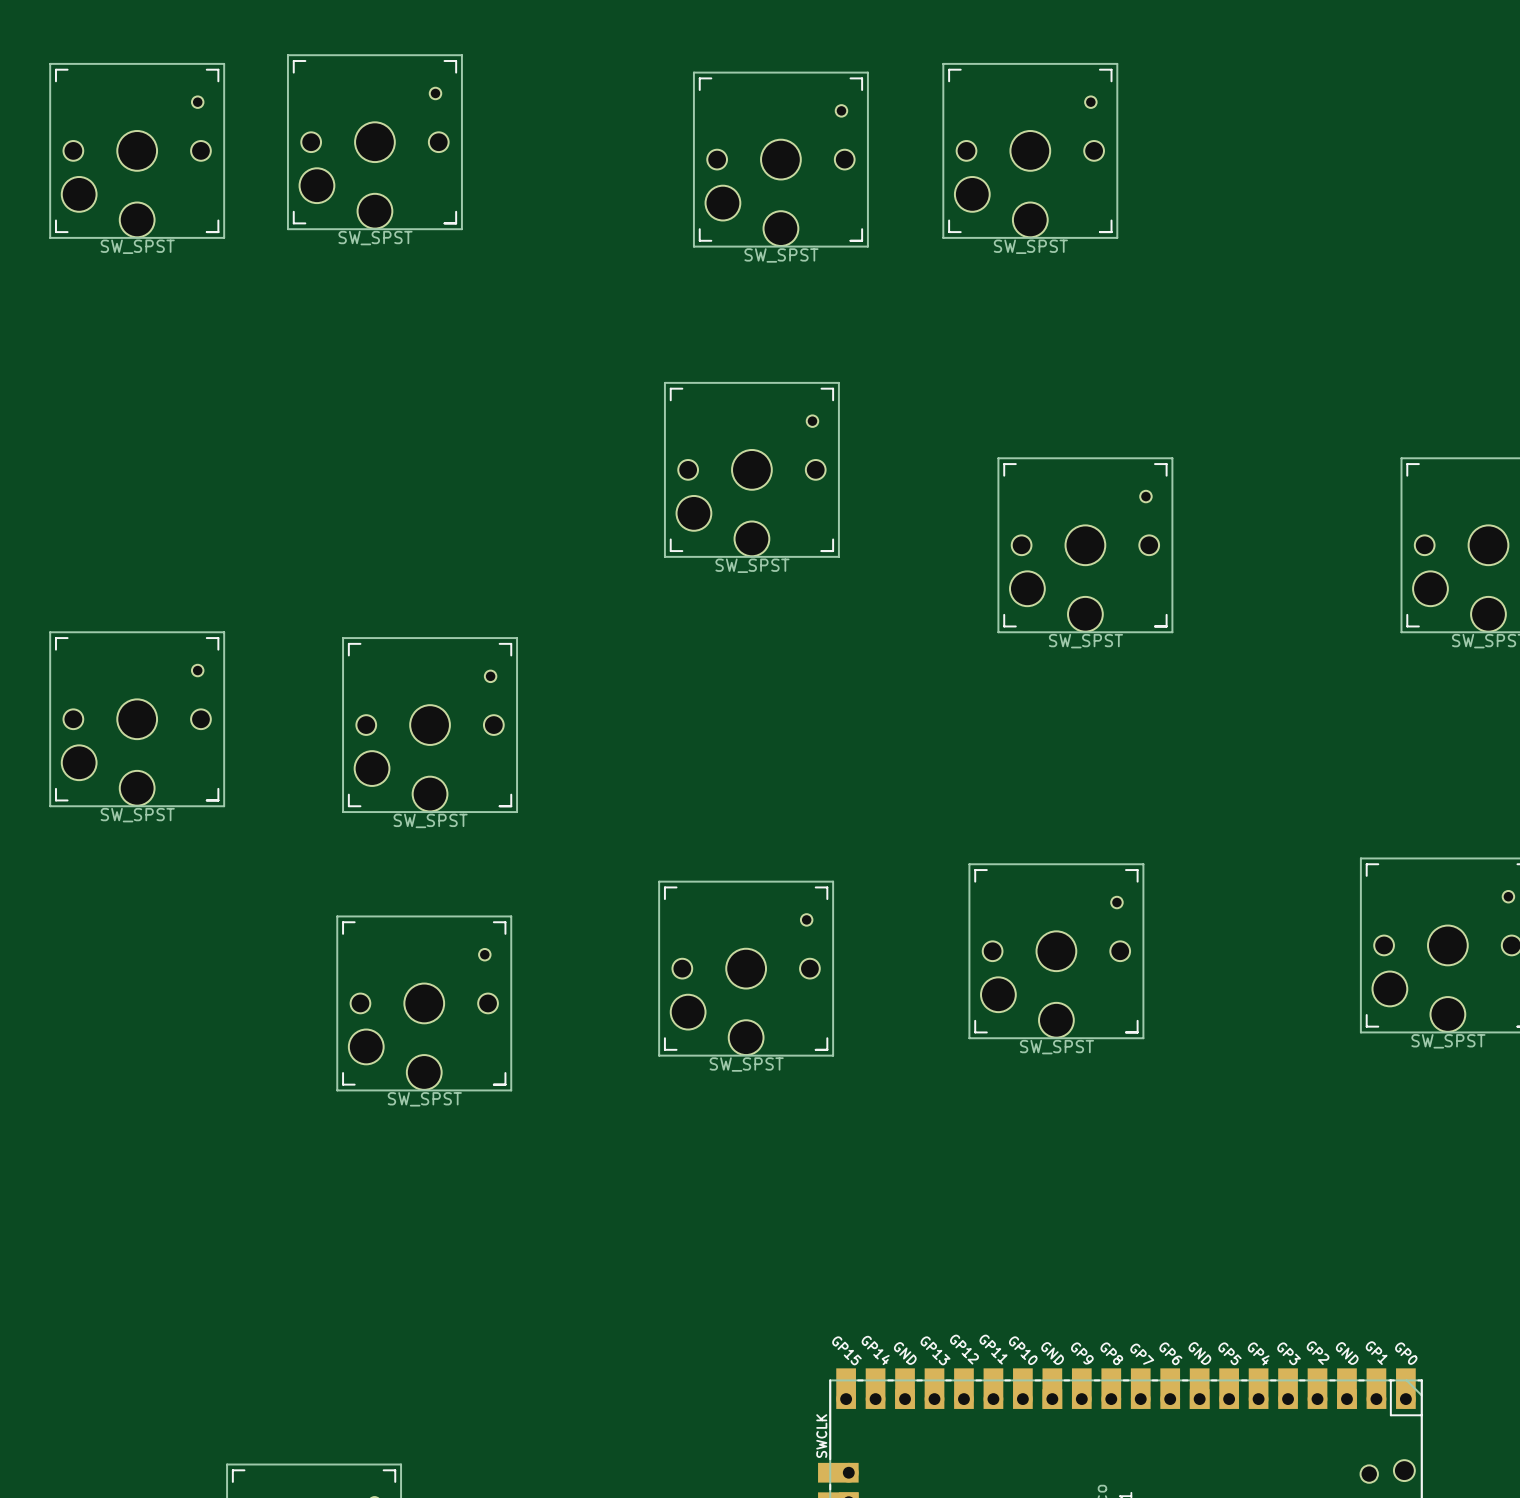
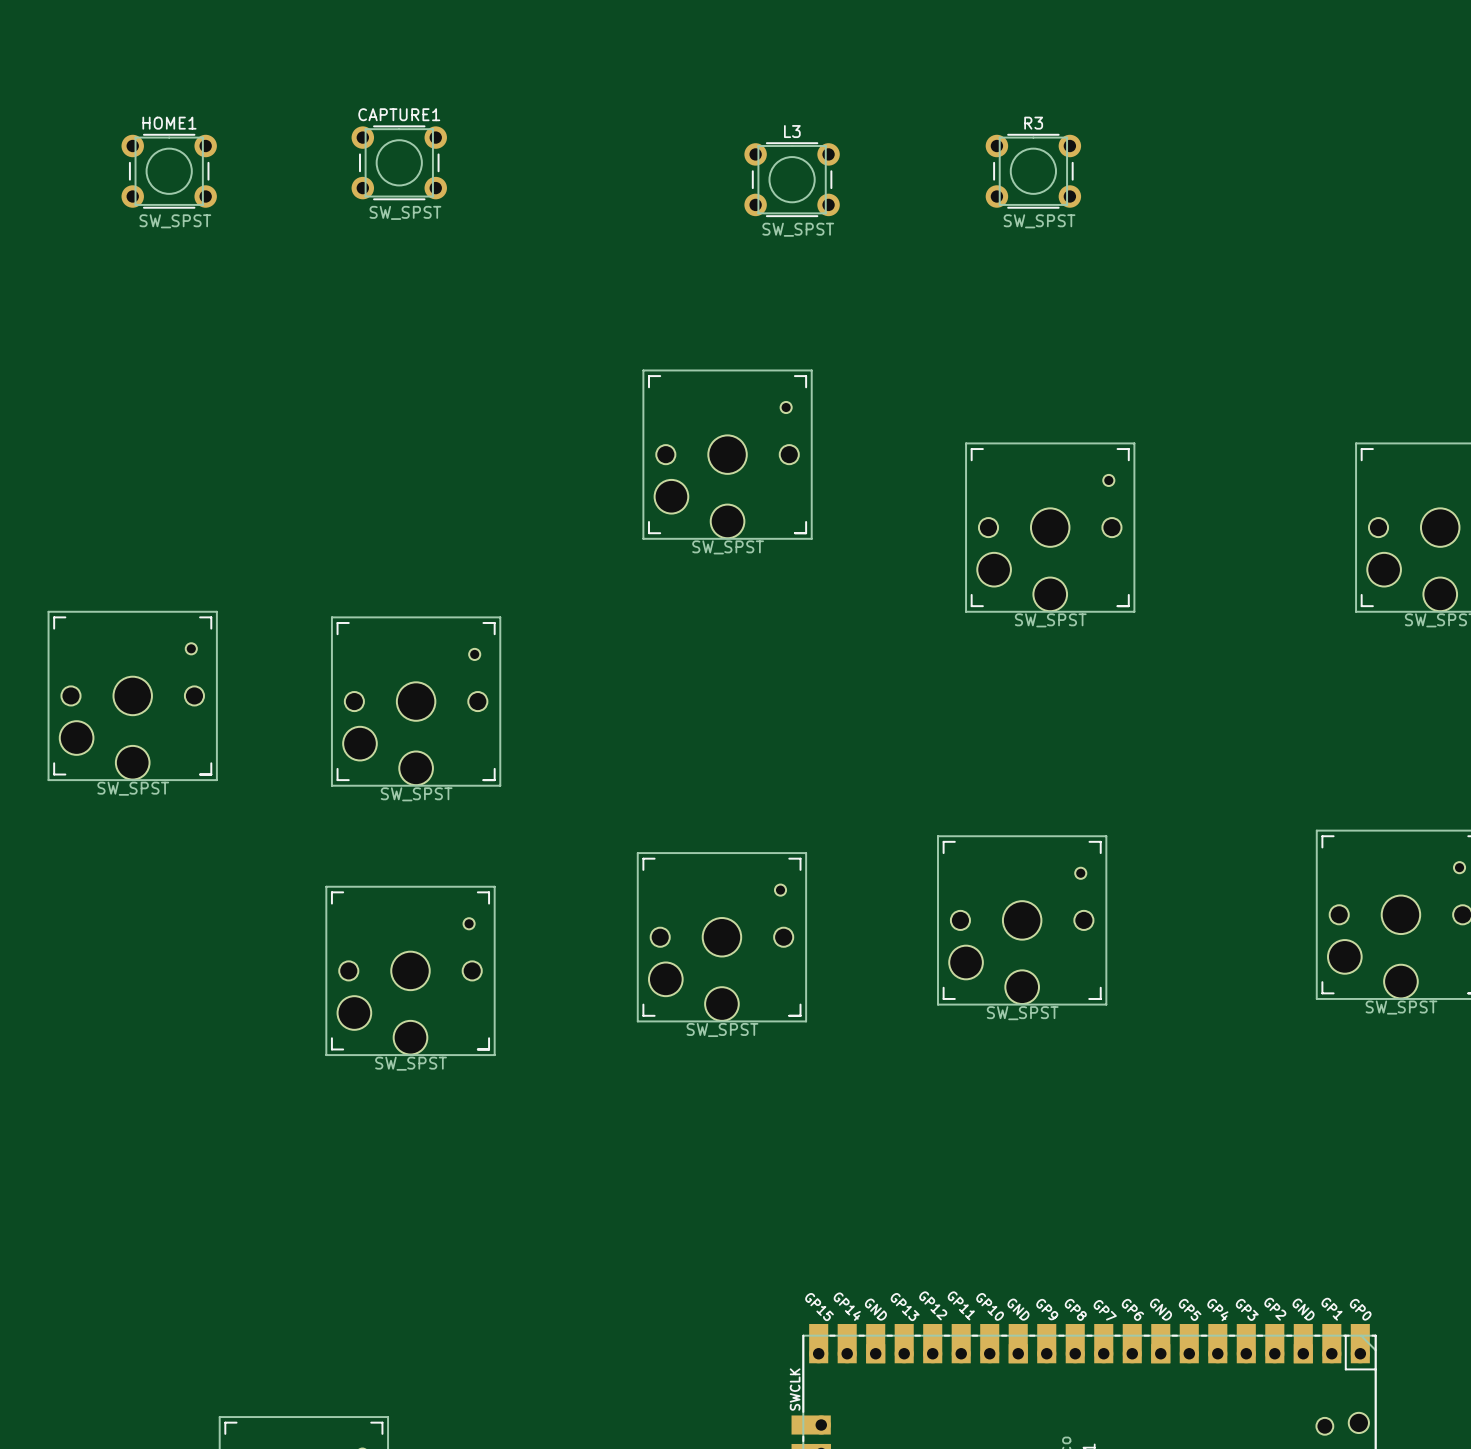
part: SW_SPST (374, 142) -> none
part: SW_SPST (137, 150) -> none
part: SW_SPST (1030, 150) -> none
part: SW_SPST (780, 159) -> none
CAPTURE1: none -> SW_SPST (399, 162)
HOME1: none -> SW_SPST (169, 171)
R3: none -> SW_SPST (1033, 171)
L3: none -> SW_SPST (792, 179)

